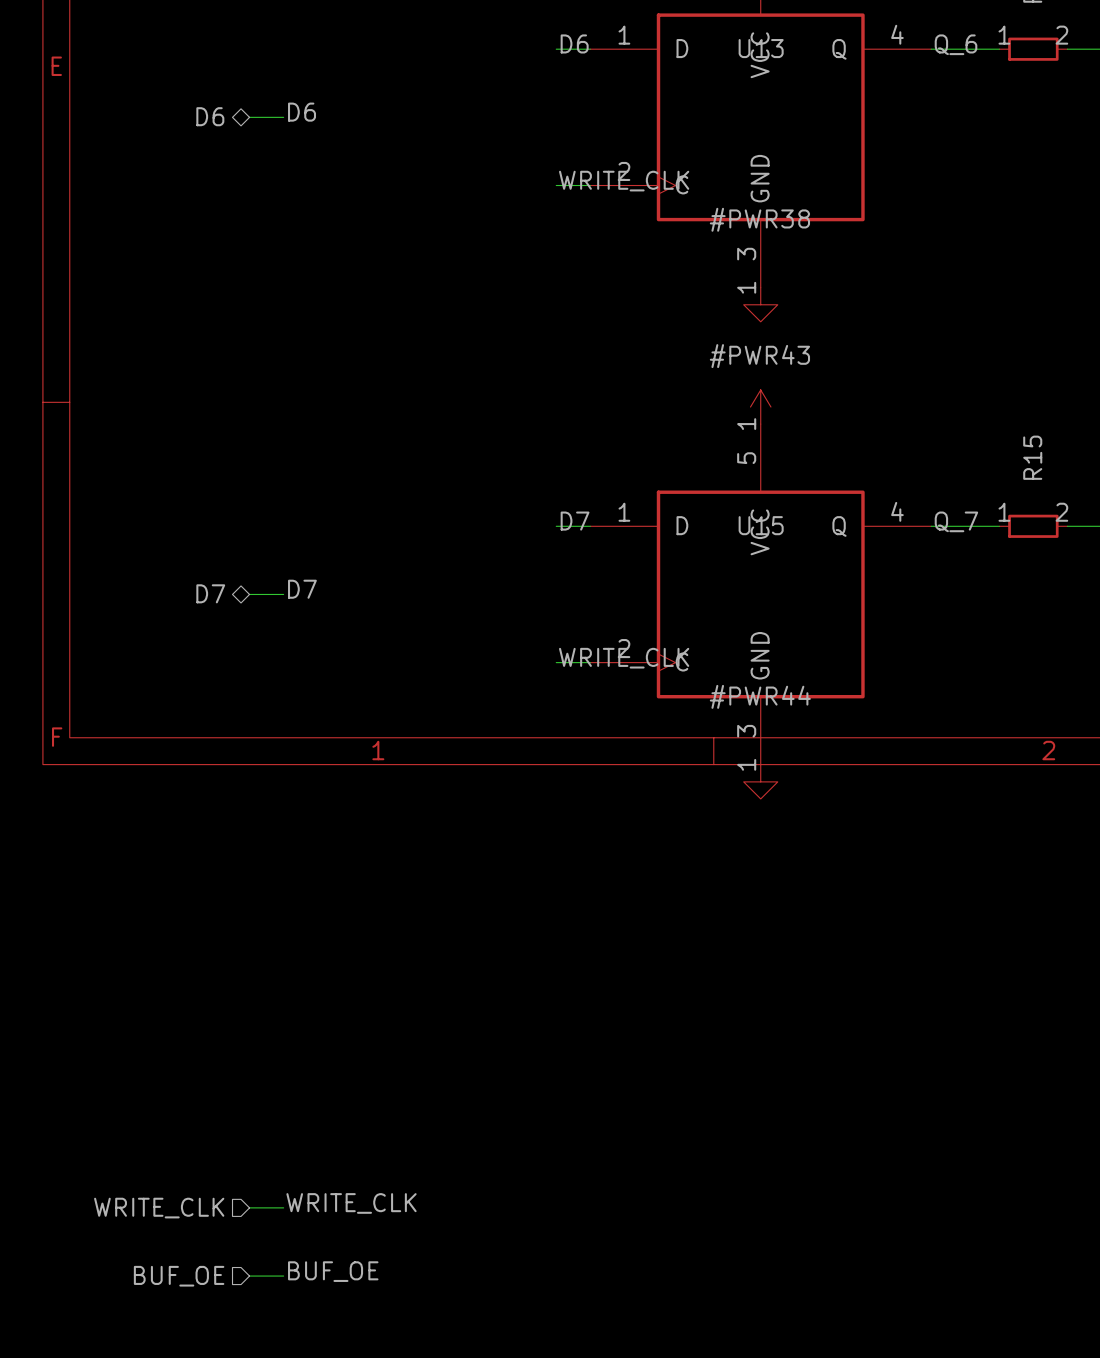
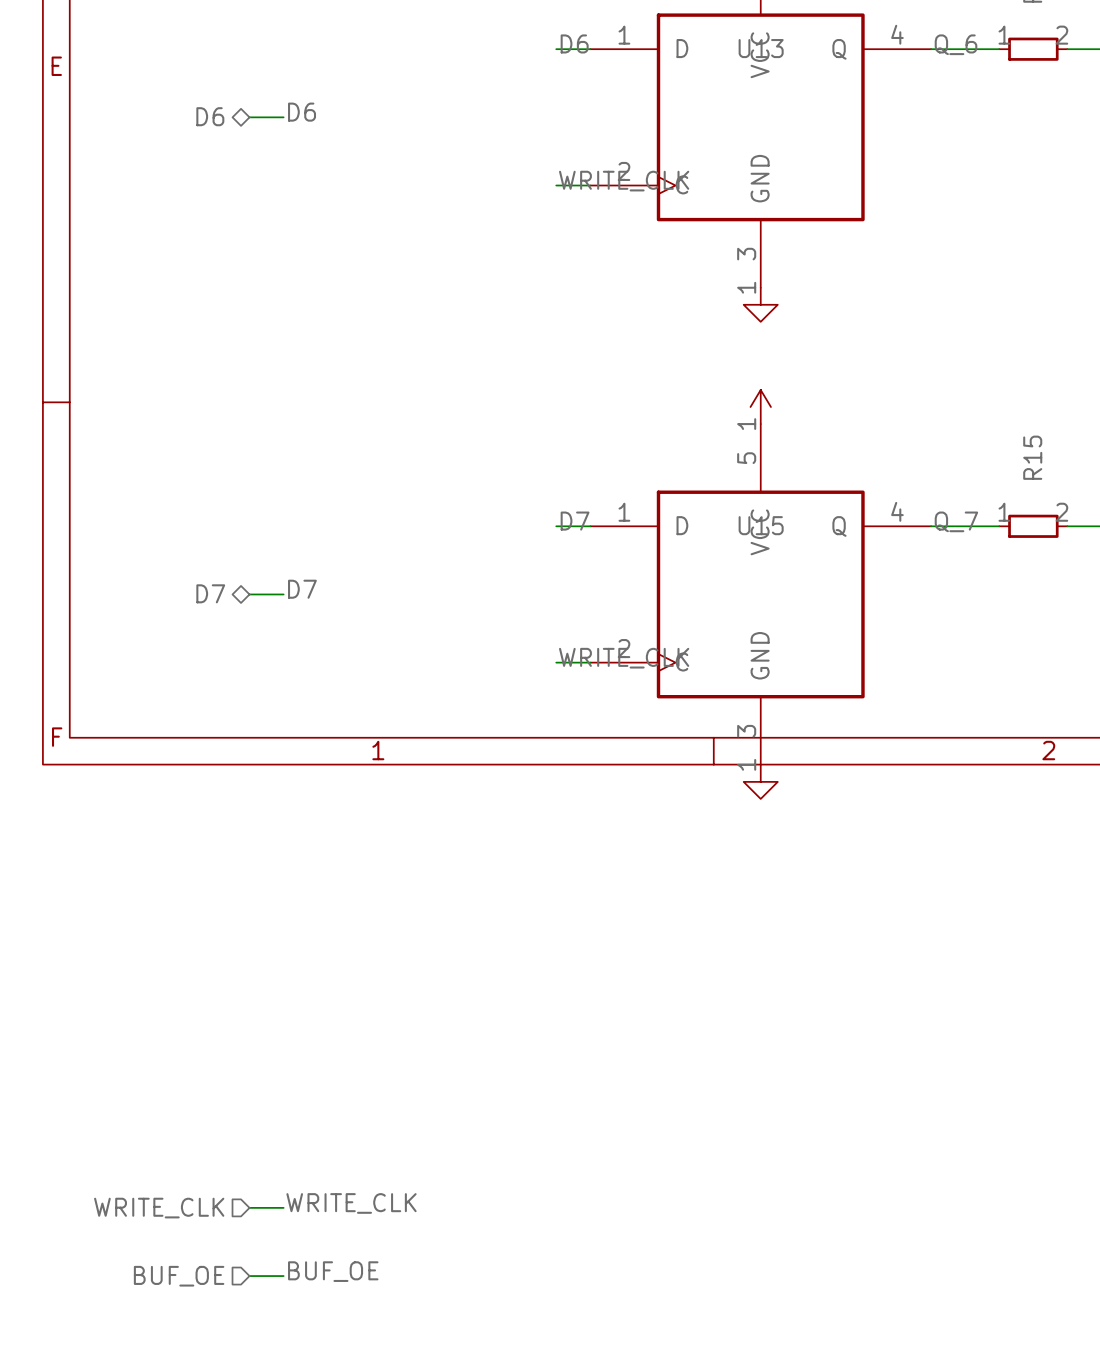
#PWR38 name: #PWR38 (759, 219) -> none
#PWR43 name: #PWR43 (759, 356) -> none
#PWR44 name: #PWR44 (760, 696) -> none

